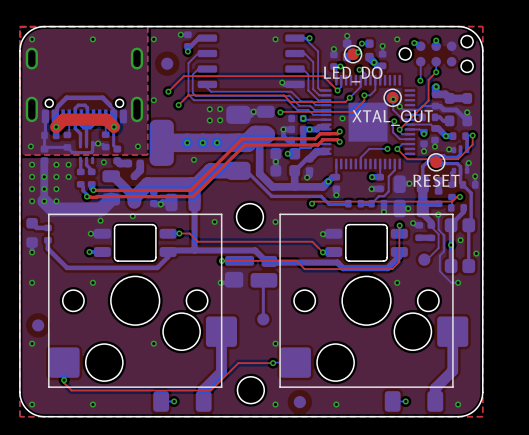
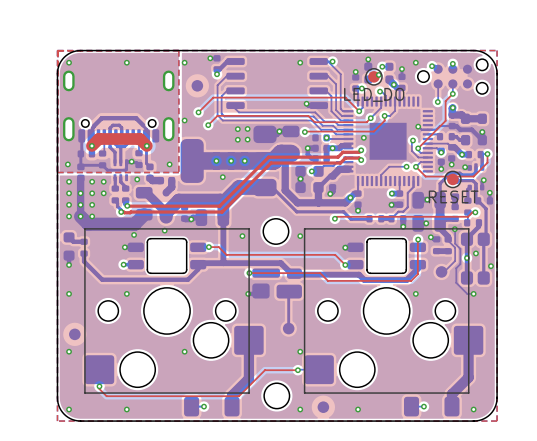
part: XTAL_OUT (392, 97) -> none
bottom track: (393, 99) (393, 109) (403, 119) (409, 119) -> none
via: (393, 99) -> none

